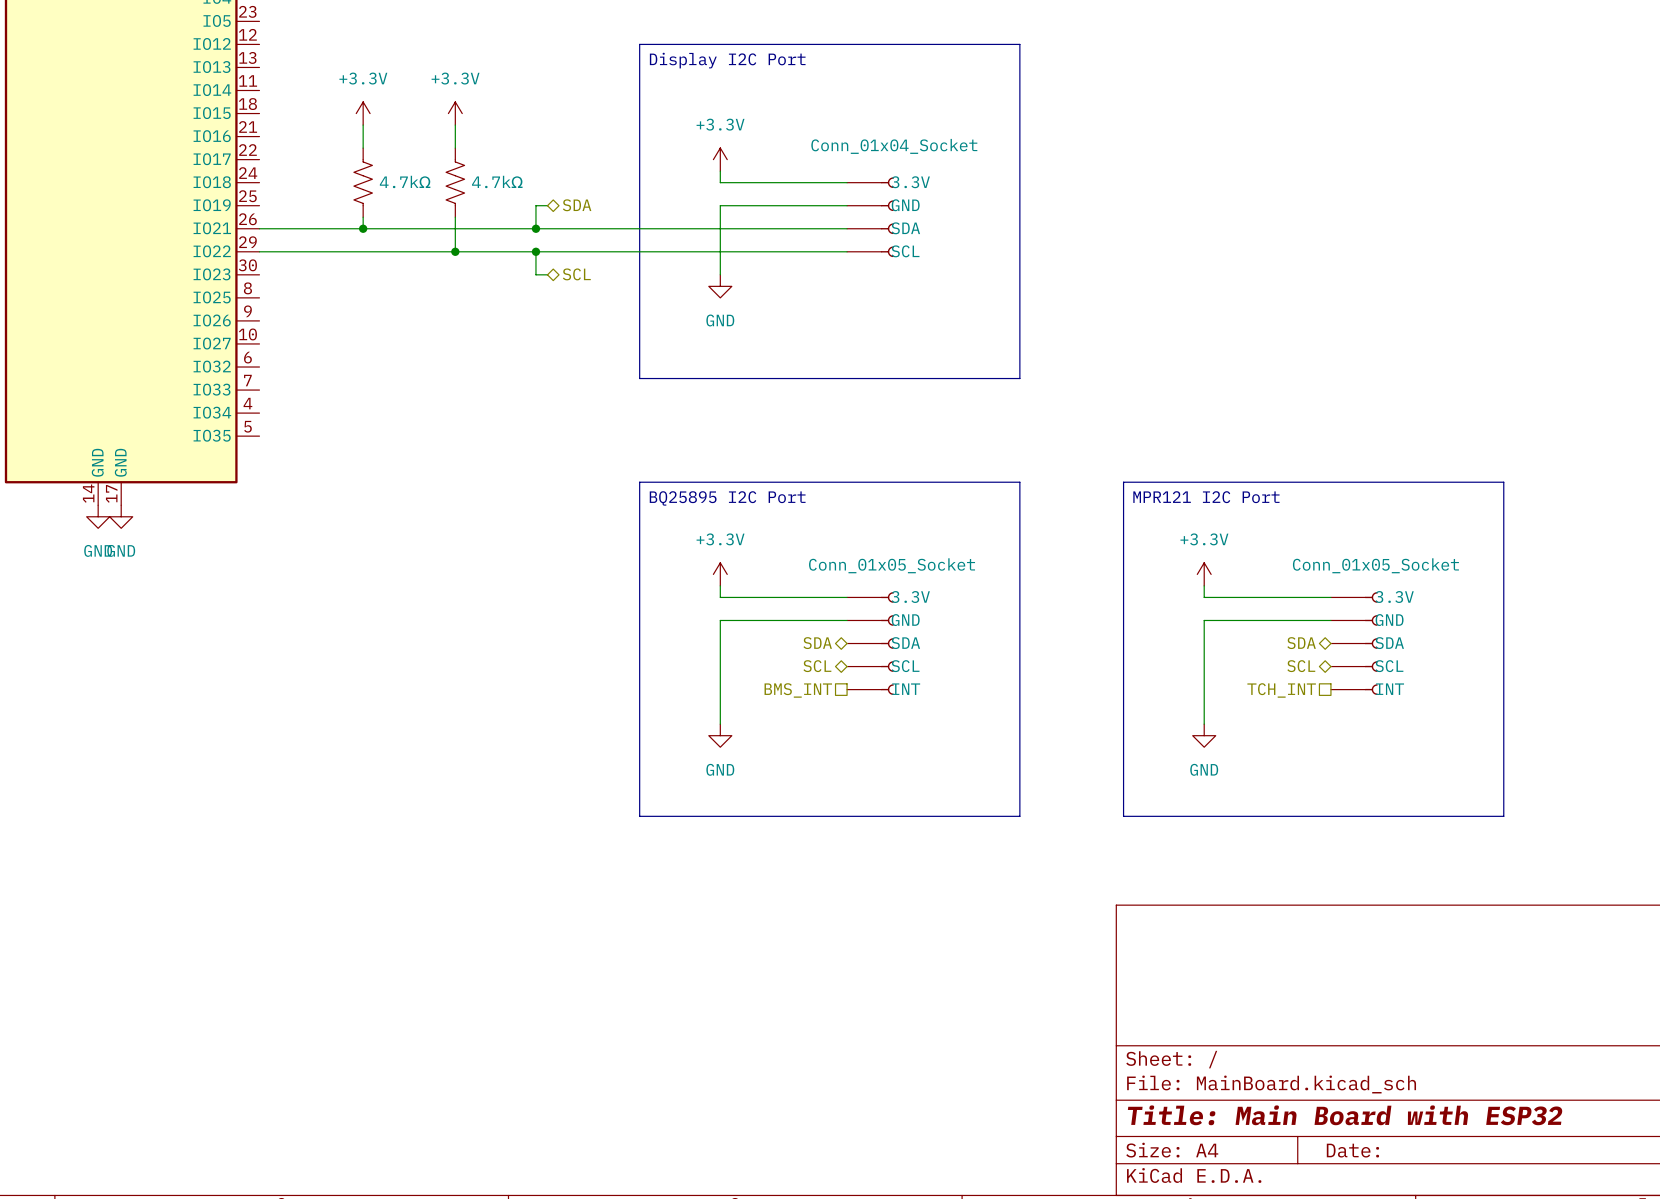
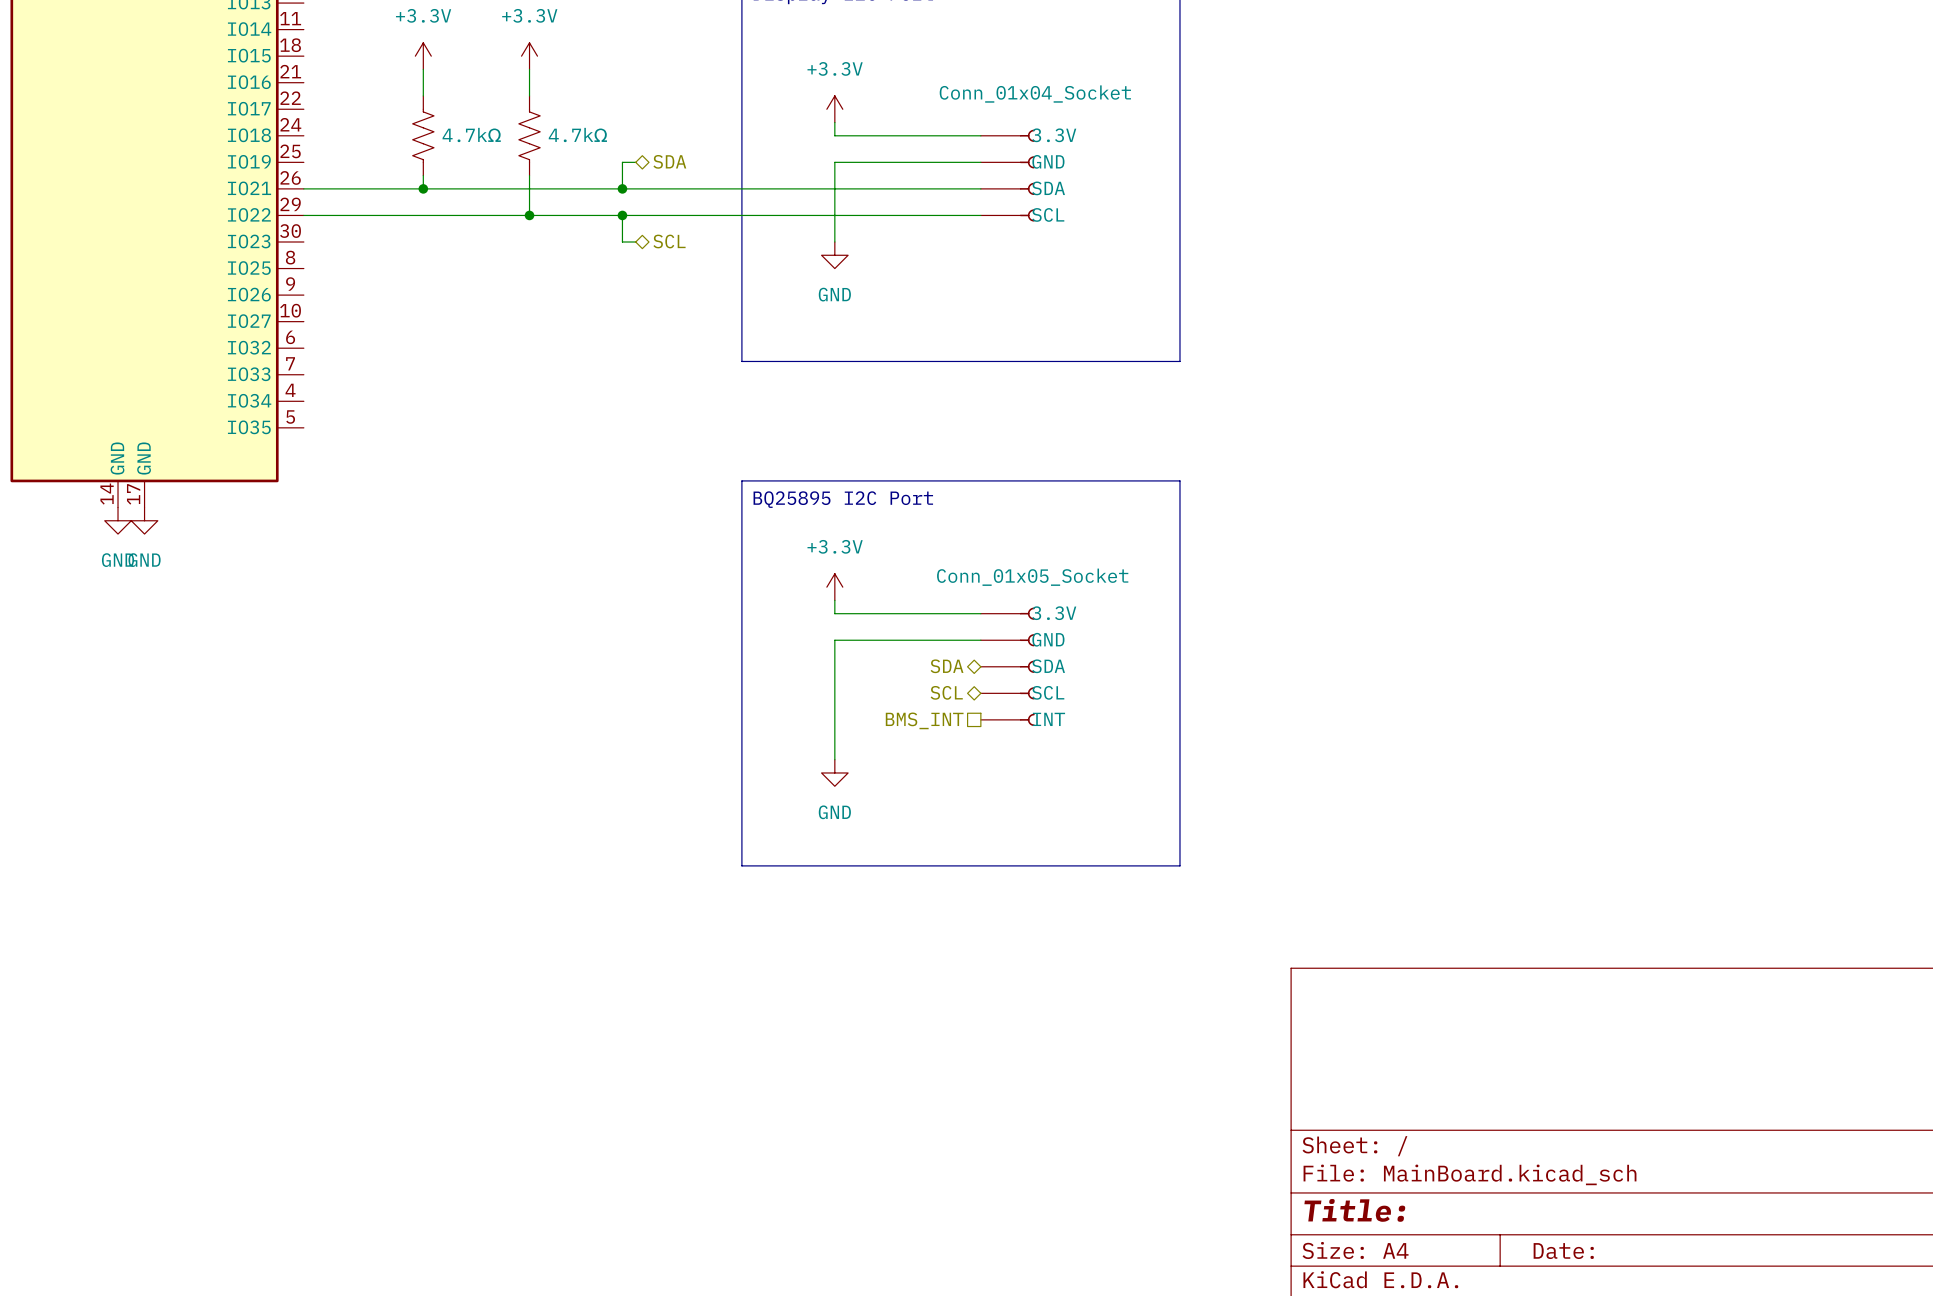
line: (1123, 482) (1503, 482) (1503, 816) (1123, 816) (1123, 482) -> none
text: MPR121 I2C Port (1206, 497) -> none
power symbol: +3.3V (1204, 574) -> none
wire: (1204, 585) (1204, 597) (1330, 597) -> none
wire: (1330, 620) (1204, 620) (1204, 724) -> none
hierarchical label: SDA (1301, 643) -> none
part: Conn_01x05_Socket (1354, 643) -> none
hierarchical label: SCL (1301, 666) -> none
hierarchical label: TCH_INT (1281, 690) -> none
power symbol: GND (1204, 735) -> none
title block: Title: Main Board with ESP32 (1345, 1115) -> Title: (1354, 1210)

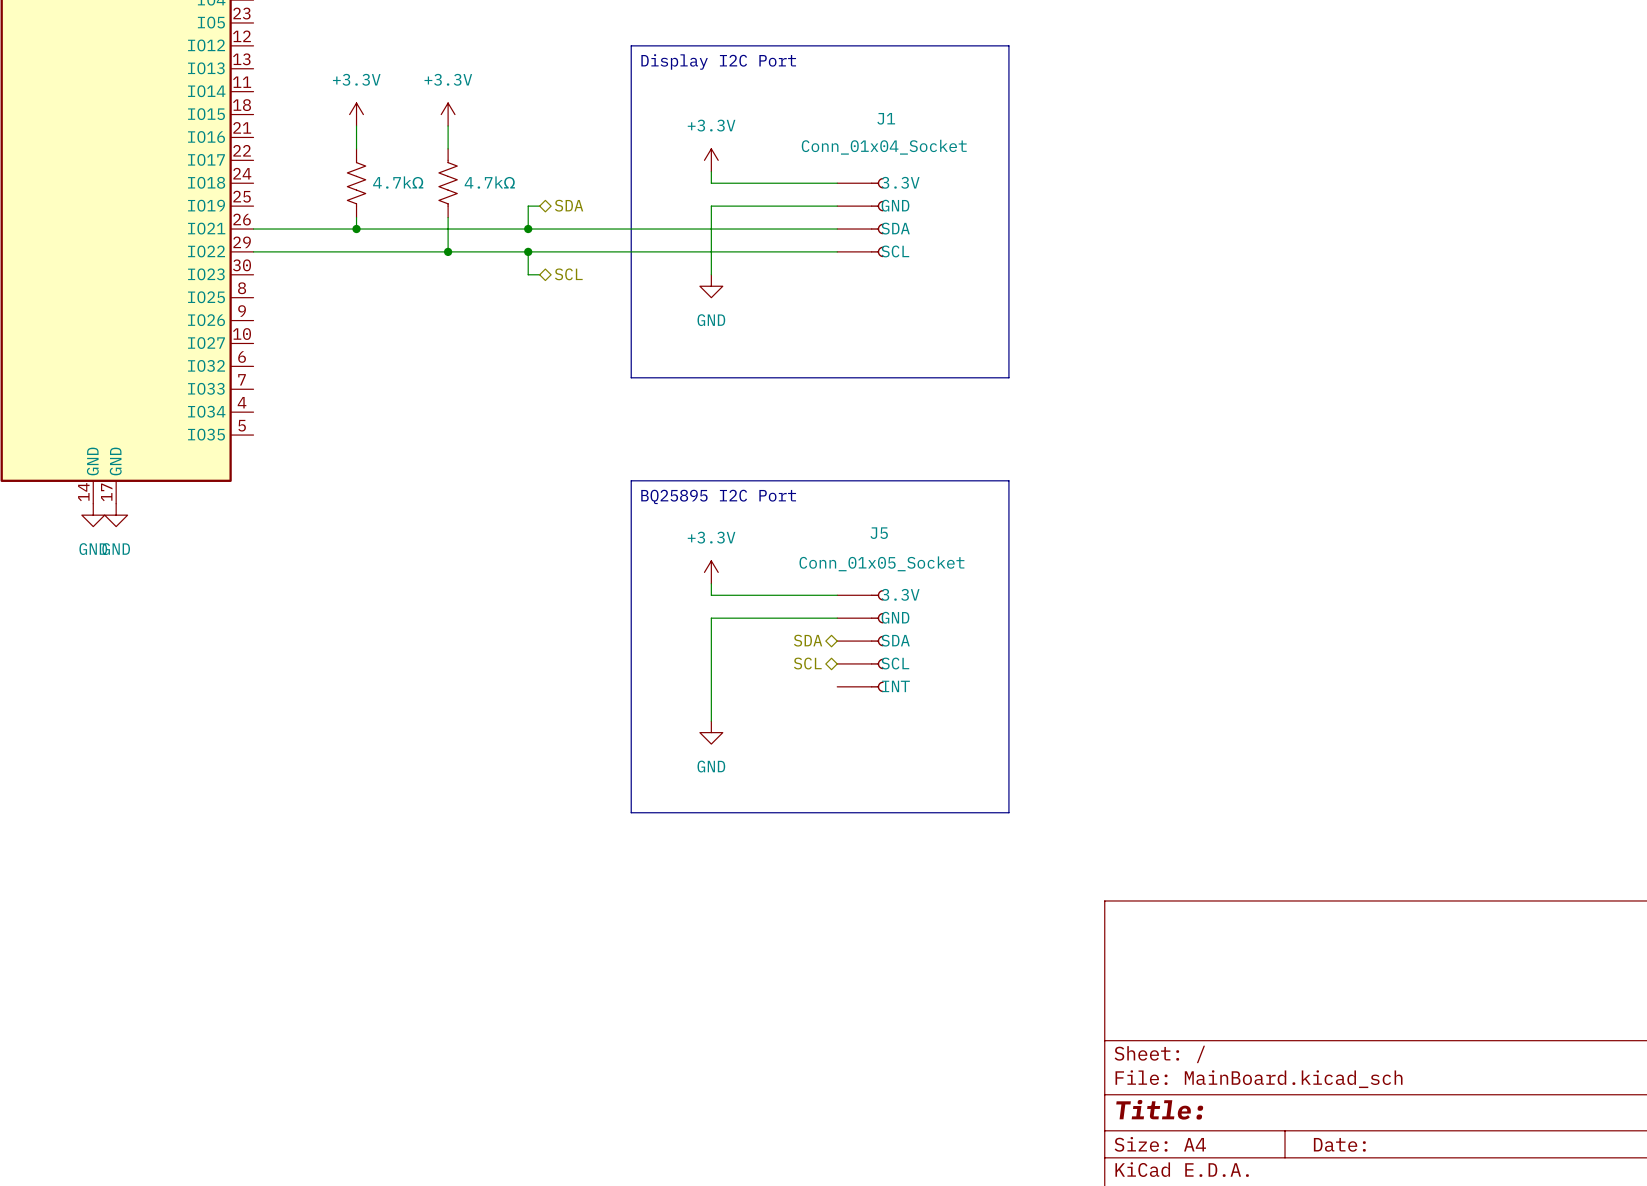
J1 name: none -> J1 (886, 118)
J5 name: none -> J5 (879, 533)
hierarchical label: BMS_INT (924, 720) -> none

